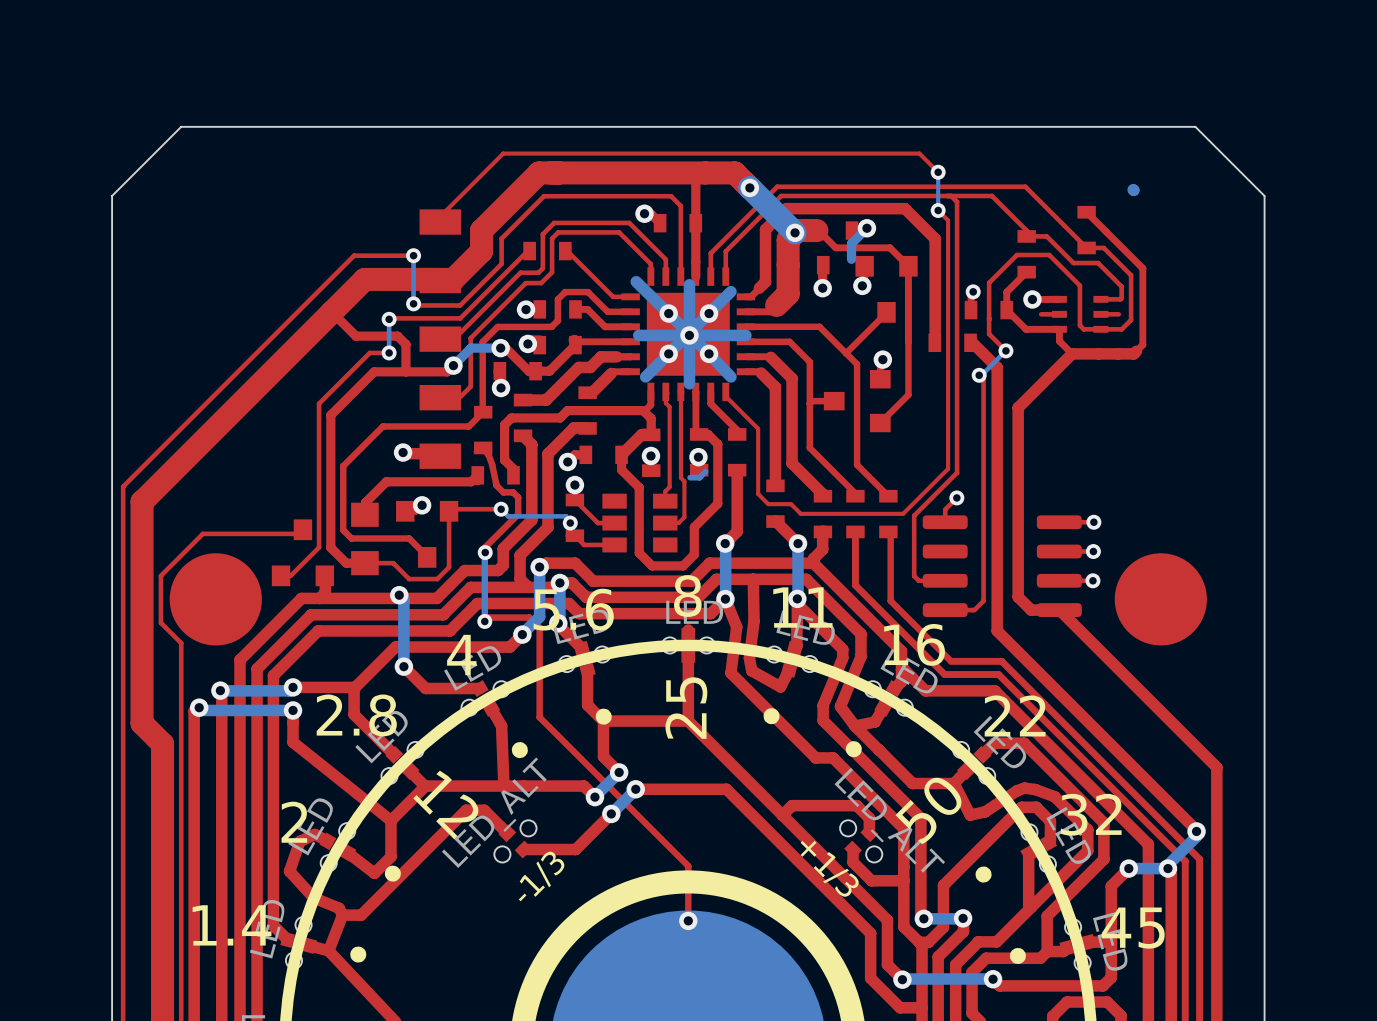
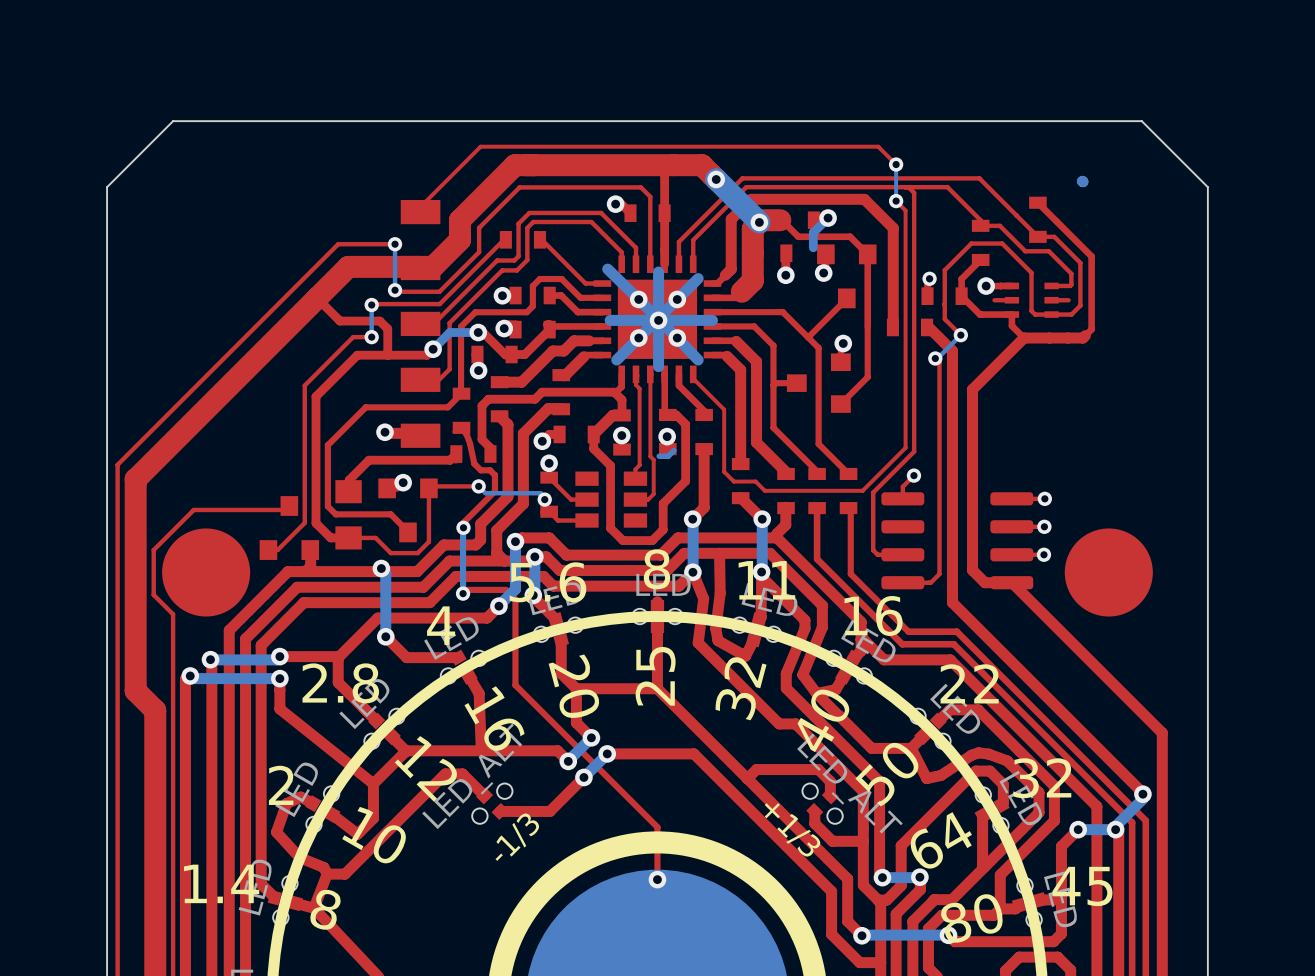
text: • (603, 716) -> 20 (574, 686)
text: • (771, 716) -> 32 (741, 688)
text: • (853, 749) -> 40 (824, 720)
text: • (519, 750) -> 16 (494, 718)
text: • (392, 873) -> 10 (374, 835)
text: • (983, 874) -> 64 (940, 841)
text: • (358, 954) -> 8 (325, 909)
text: • (1017, 955) -> 80 (971, 918)

